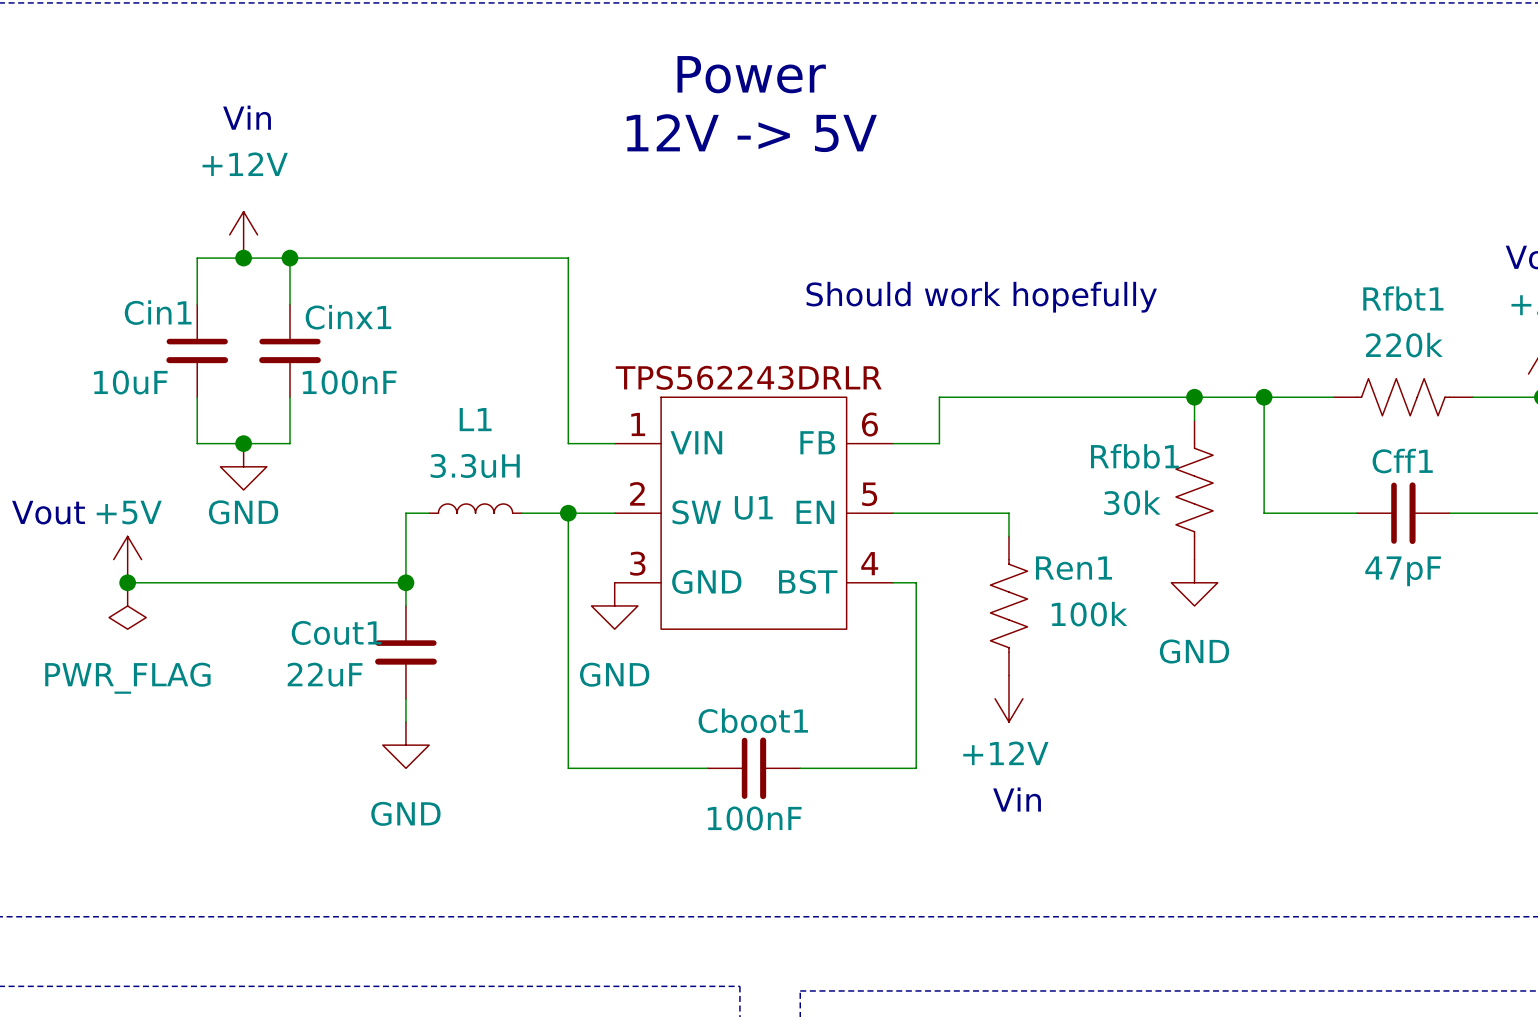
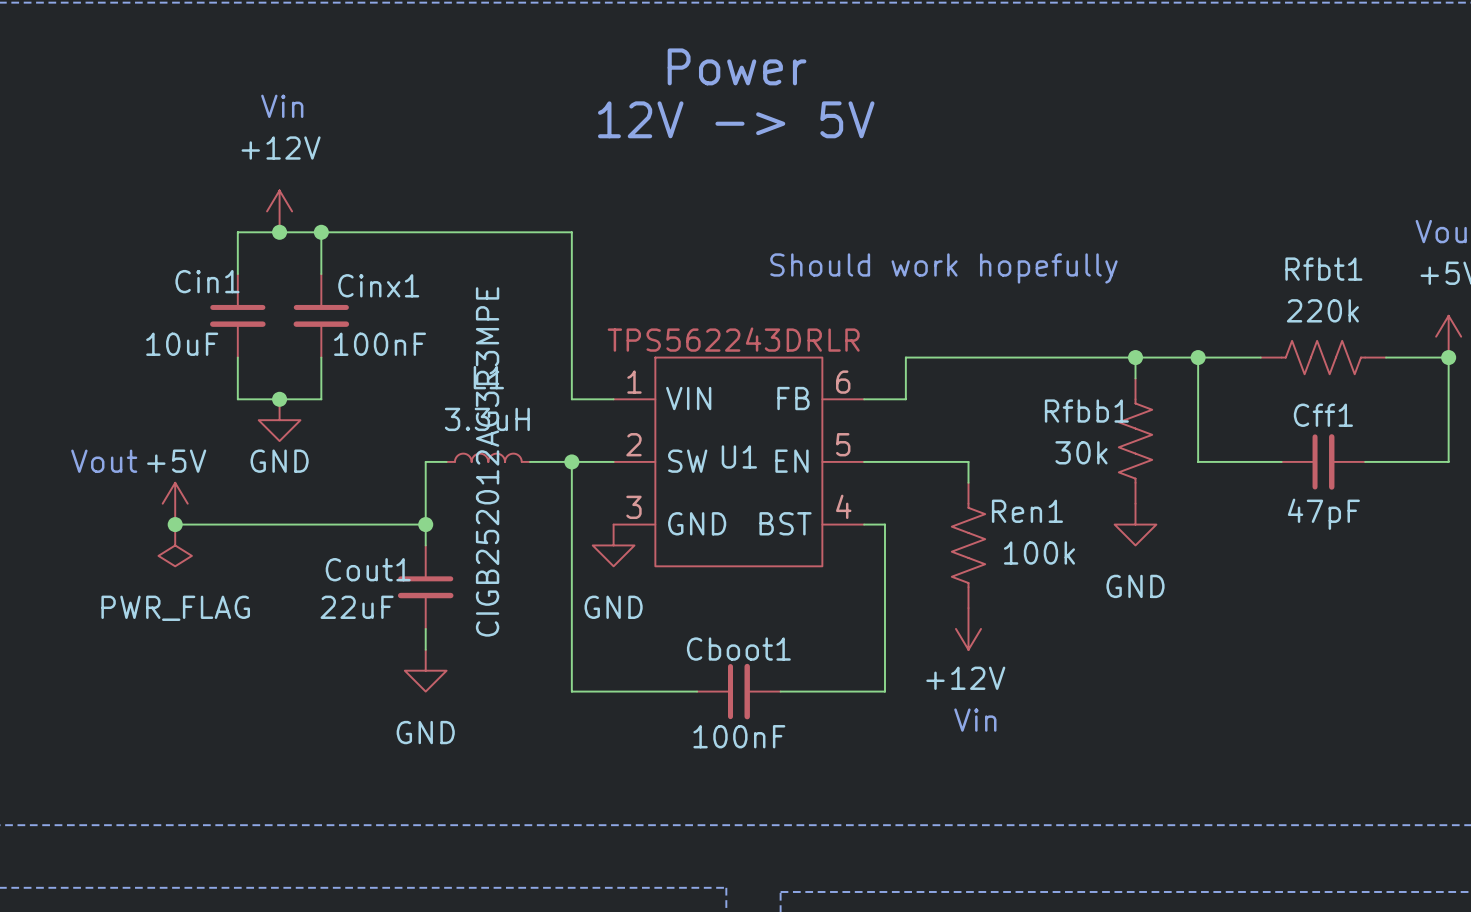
L1 text: none -> CIGB252012AG3R3MPE (487, 461)

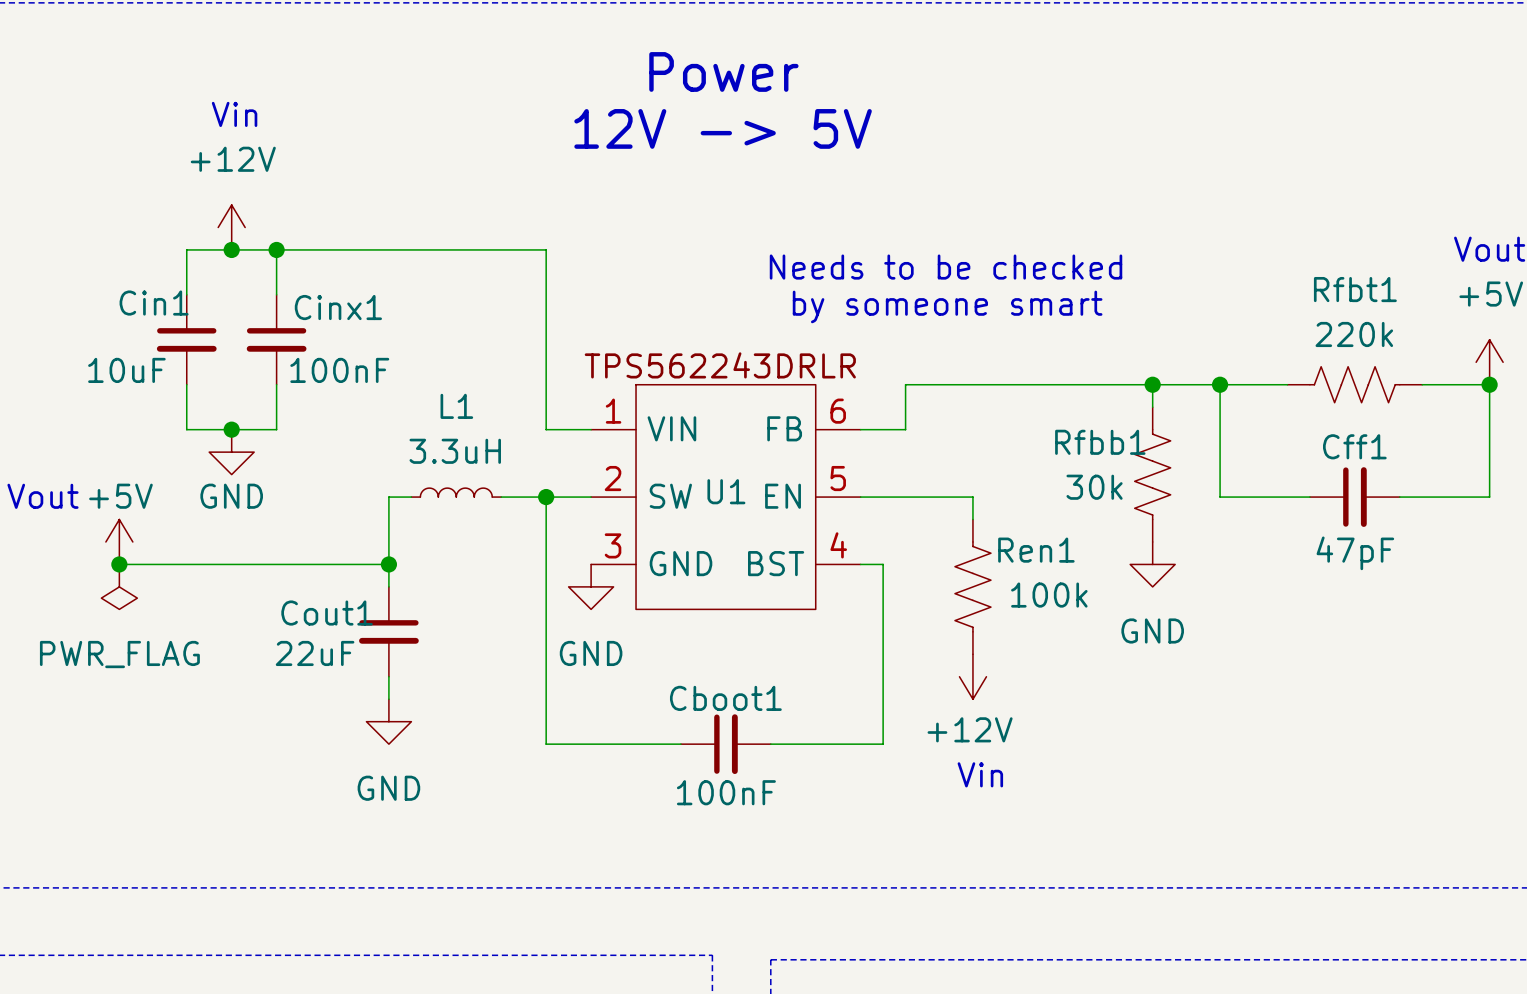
text: none -> Needs to be checked (946, 267)
text: Should work hopefully (943, 268) -> none
text: none -> by someone smart (947, 306)
L1 text: CIGB252012AG3R3MPE (487, 461) -> none

